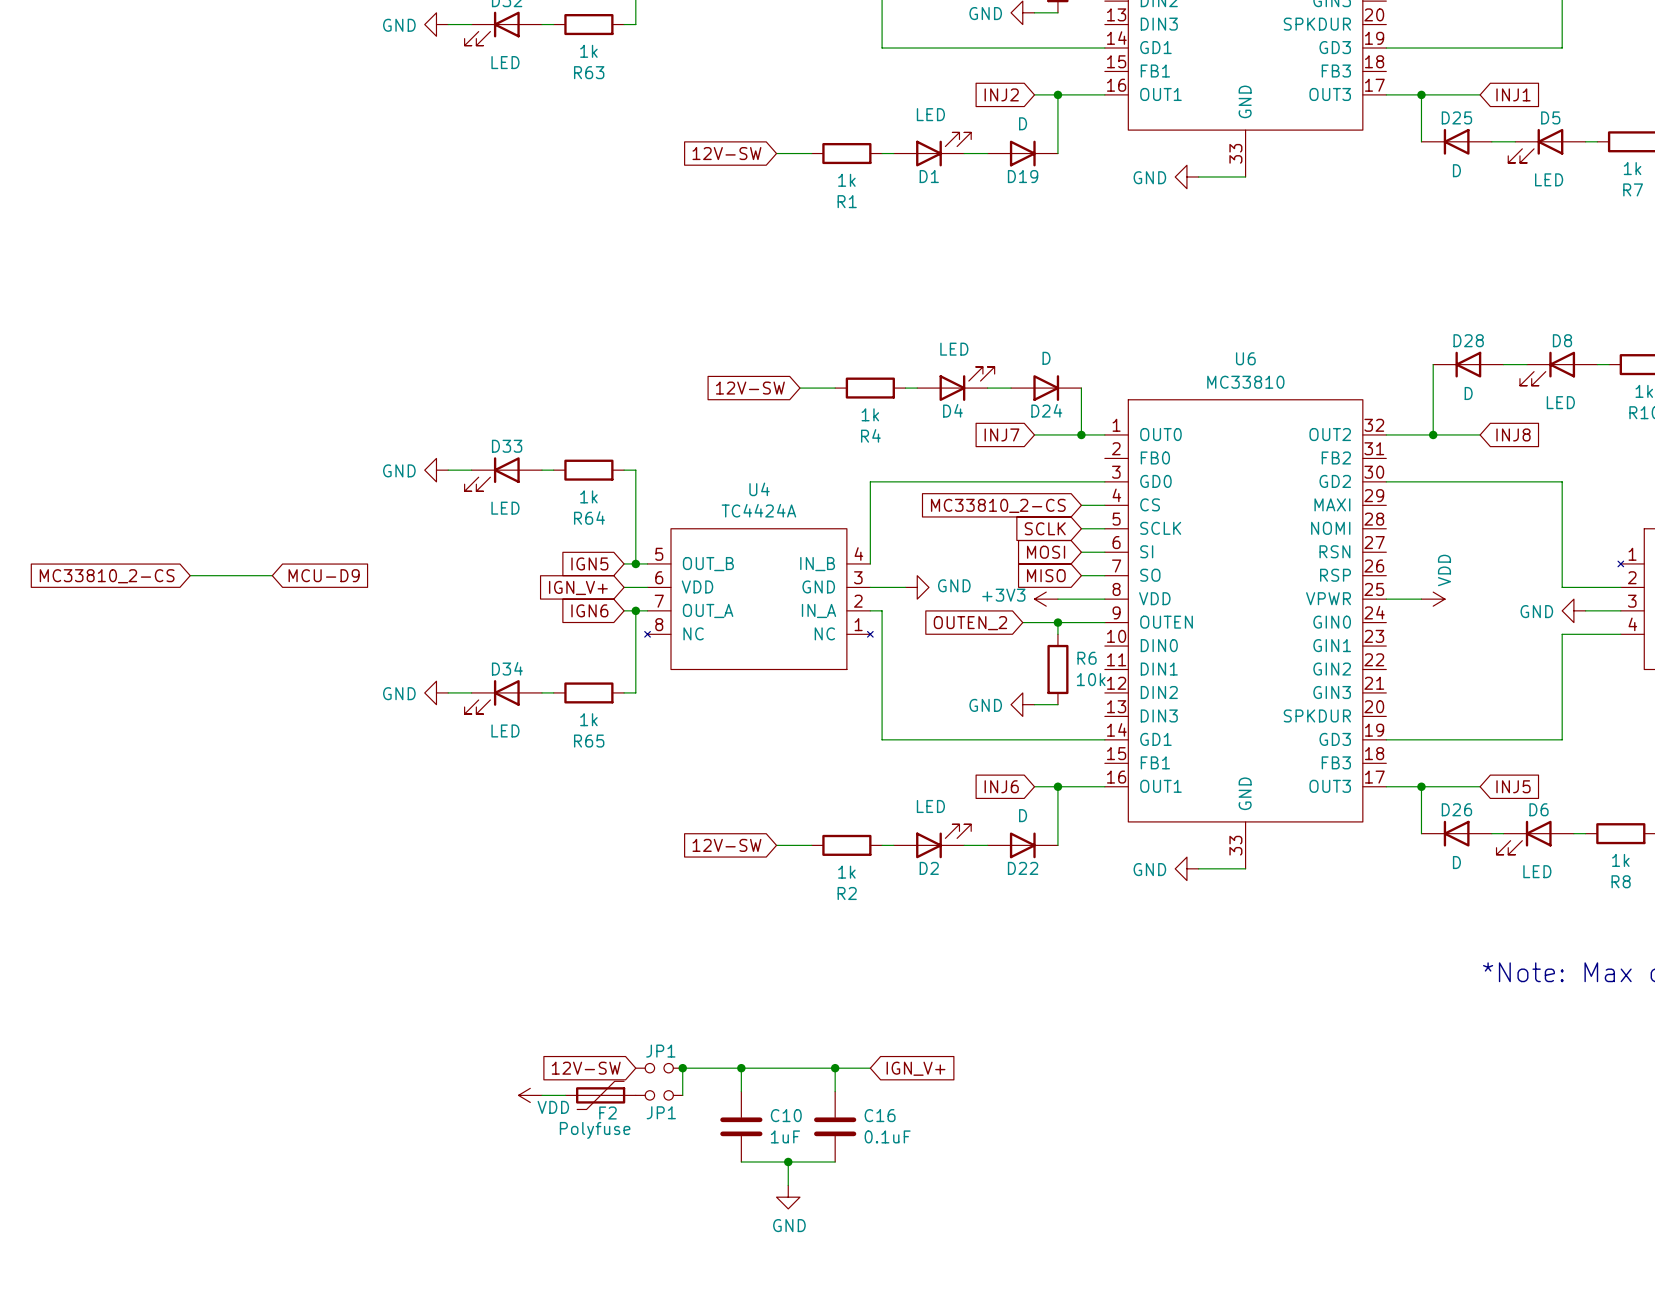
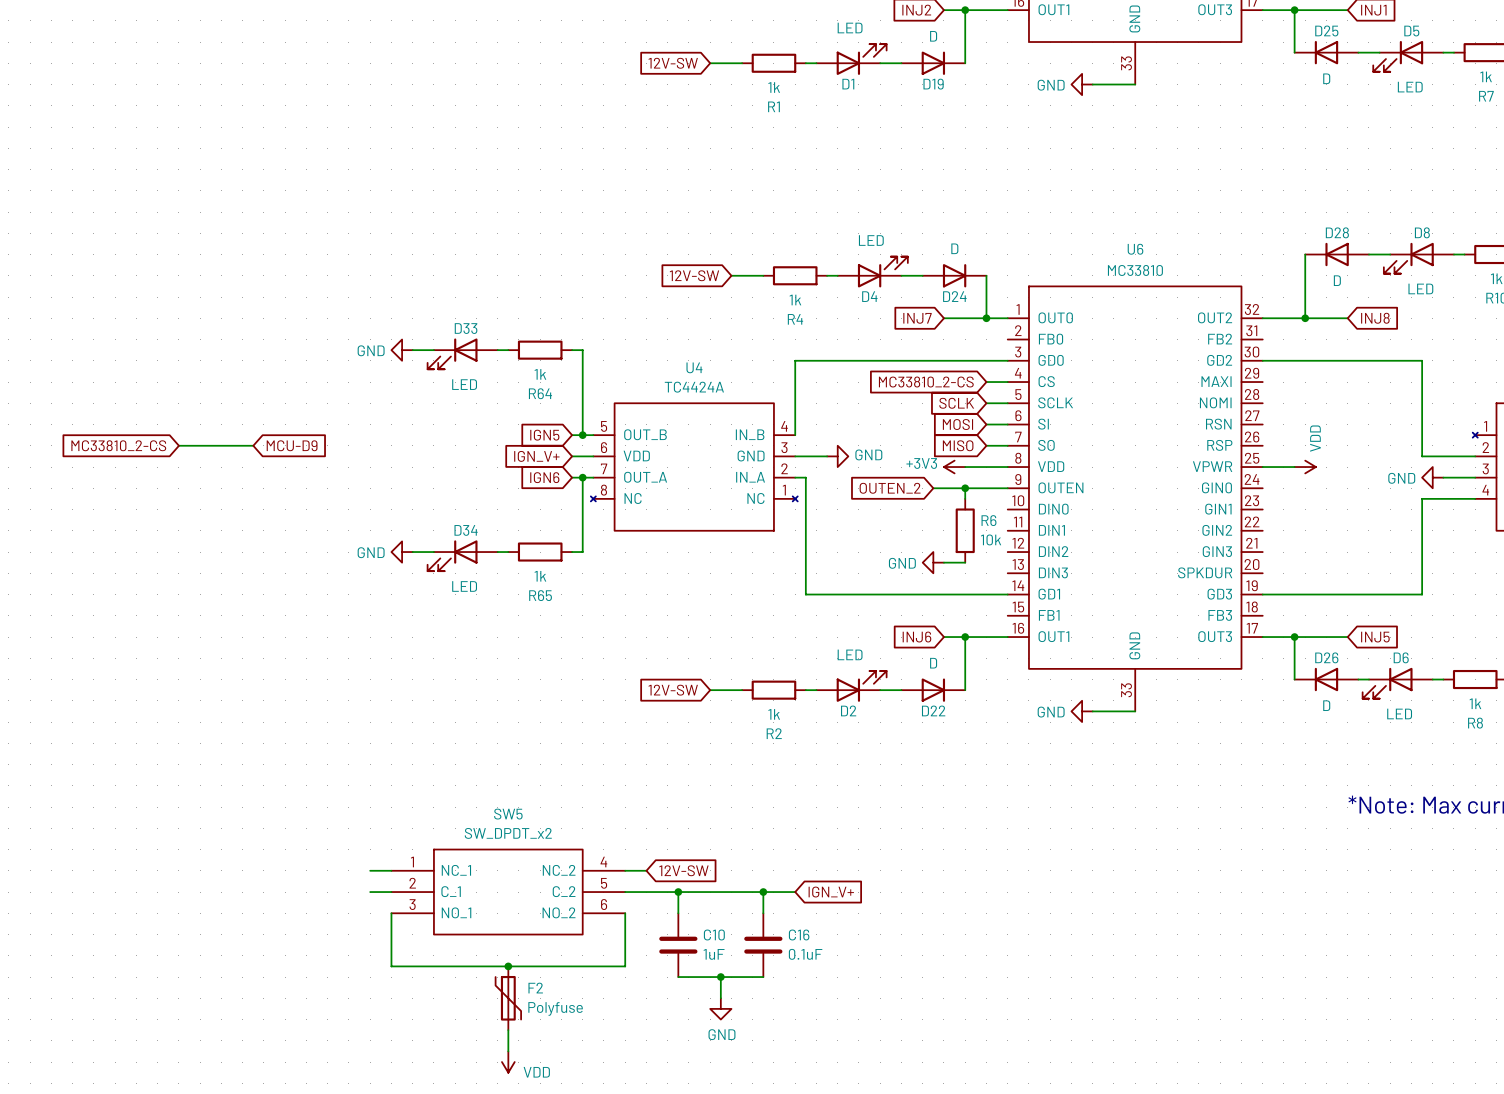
wire: none -> (370, 870) (391, 870)
wire: none -> (625, 870) (646, 870)
SW5: none -> SW_DPDT_x2 (508, 892)
global label rotation: 0° (586, 1068) -> 180° (683, 870)
global label position: 12V-SW (586, 1068) -> 12V-SW (683, 870)
JP1: (659, 1068) -> none
wire: (682, 1068) (682, 1091) -> (508, 1030) (508, 1051)
junction: (682, 1068) -> none
wire: none -> (391, 913) (391, 966) (625, 966) (625, 916)
power symbol rotation: 0° (530, 1095) -> 90° counterclockwise (508, 1062)
power symbol position: VDD (530, 1095) -> VDD (508, 1062)
wire: (542, 1095) (565, 1095) -> (370, 892) (391, 892)
F2 rotation: 0° (600, 1095) -> 90° clockwise (508, 998)
F2 position: (600, 1095) -> (508, 998)
JP1: (659, 1095) -> none
F2 name position: F2 (607, 1113) -> F2 (535, 988)
F2 value position: Polyfuse (595, 1130) -> Polyfuse (555, 1008)
junction: none -> (508, 966)

